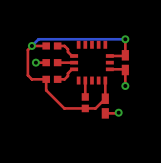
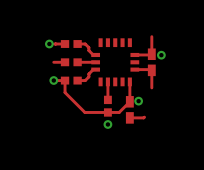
bottom track: (125, 39) (38, 39) (31, 45) -> none
via: (125, 39) -> none
top track: (36, 45) (31, 45) (27, 49) (27, 75) (31, 79) (36, 79) -> none
via: none -> (161, 55)
via position: (35, 62) -> (53, 80)
via: (125, 86) -> none
via: none -> (138, 101)
via: (118, 112) -> none
via: none -> (107, 124)

